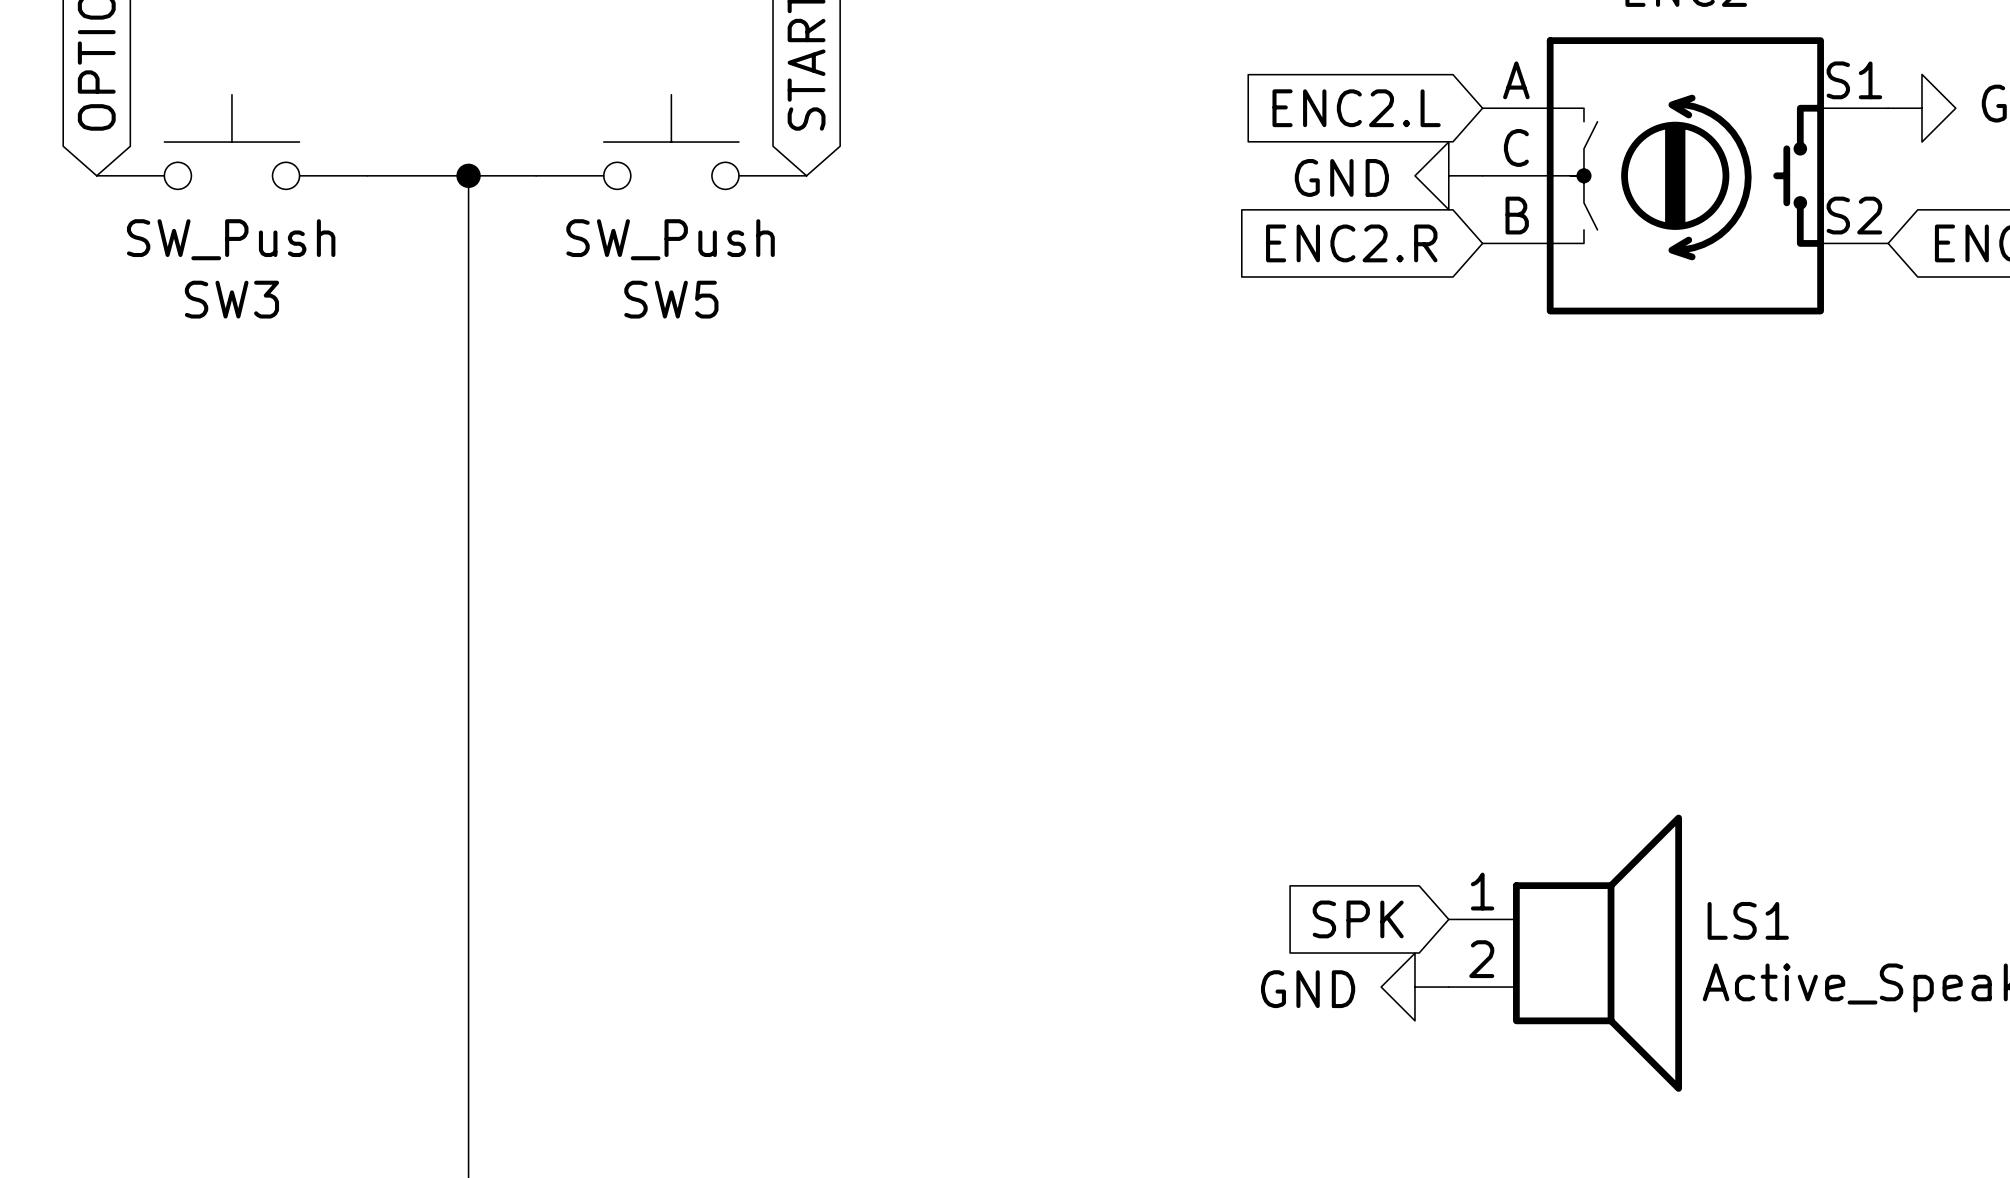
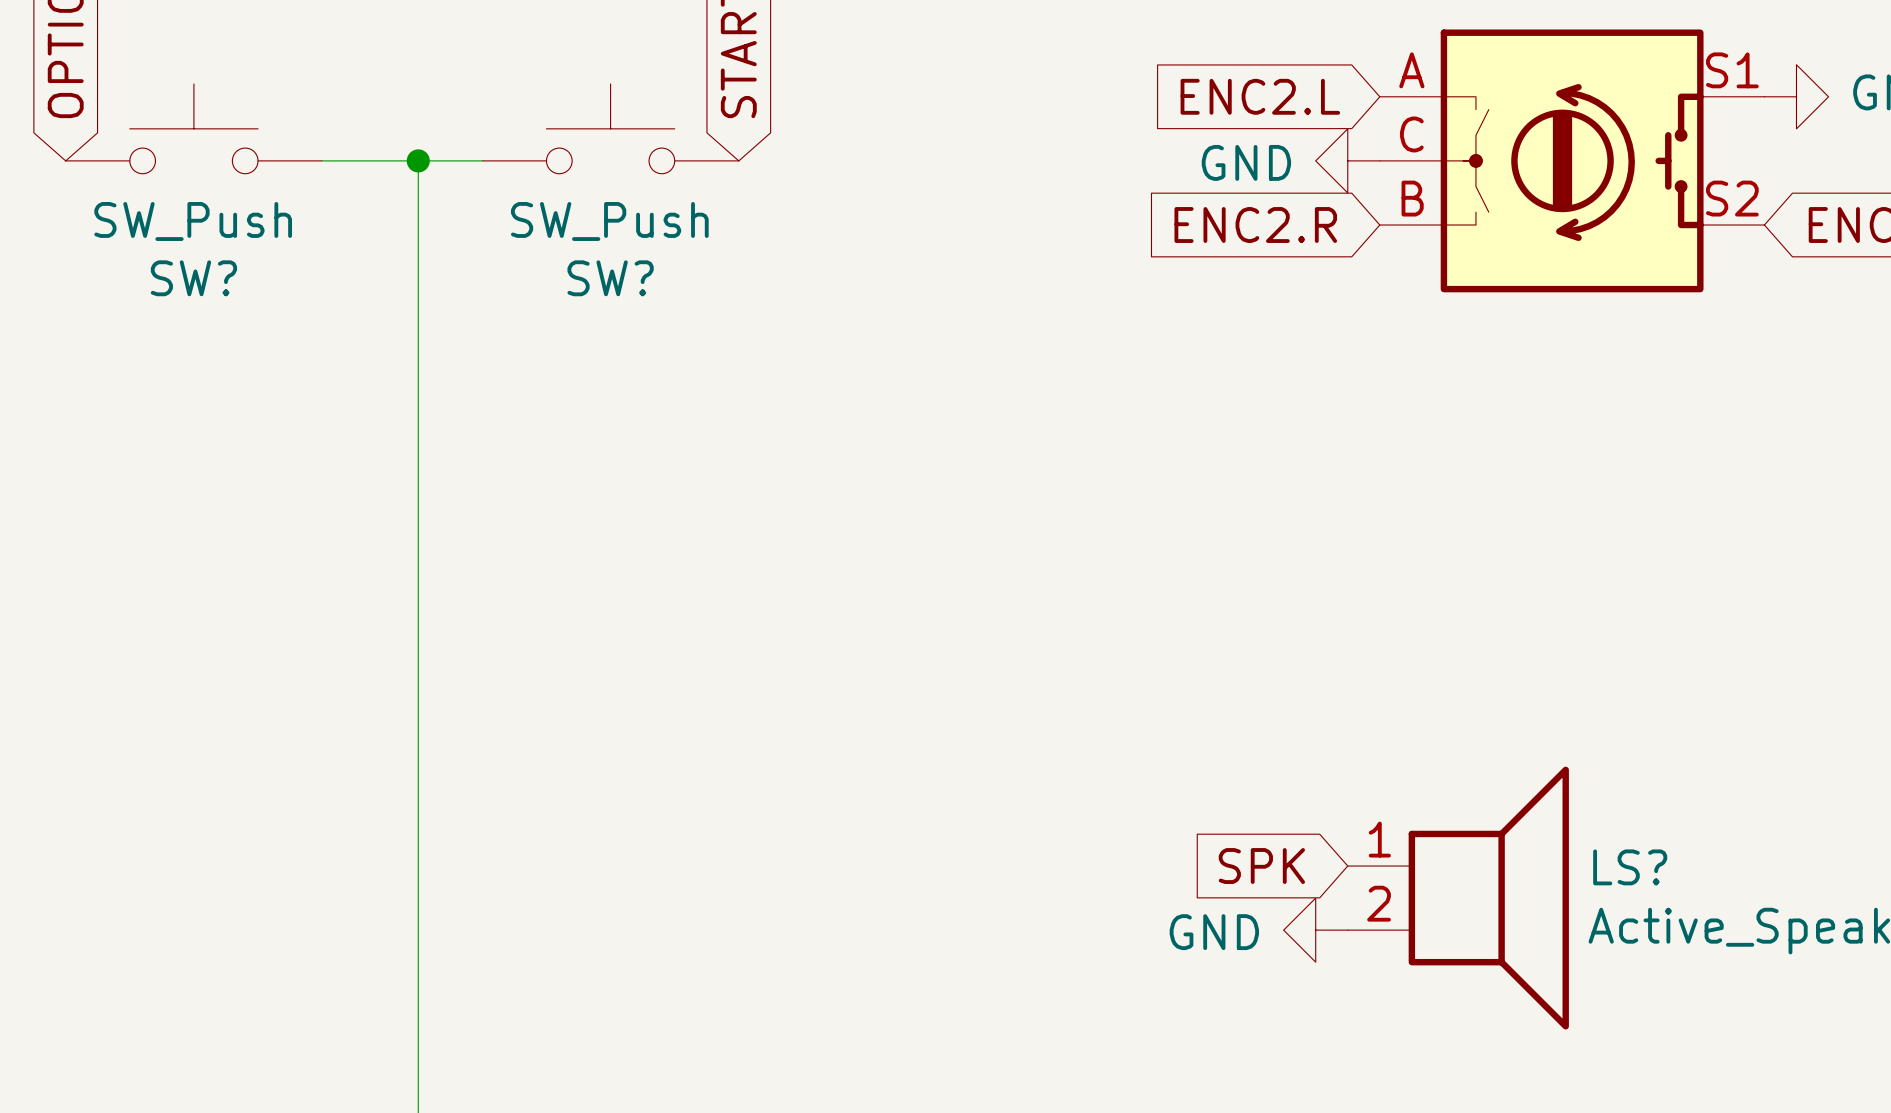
SW3 name: SW3 (231, 299) -> SW? (193, 278)
SW5 name: SW5 (671, 299) -> SW? (610, 278)
LS1 name: LS1 (1748, 920) -> LS? (1630, 867)

